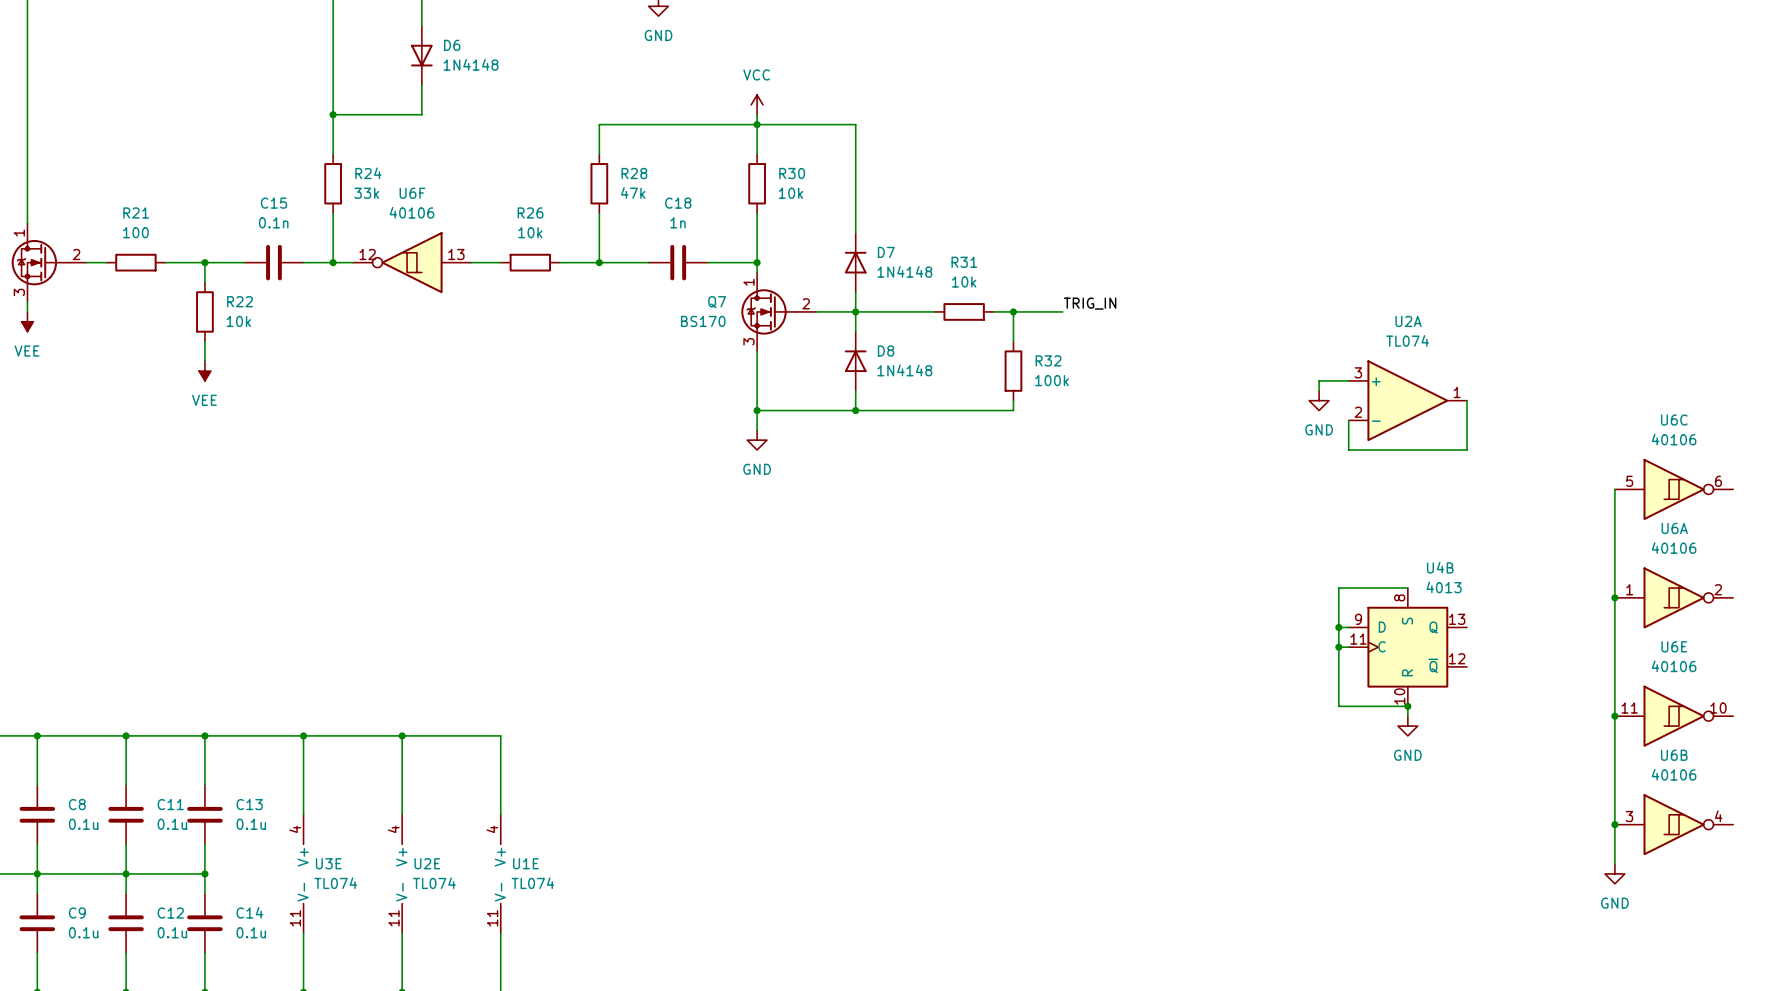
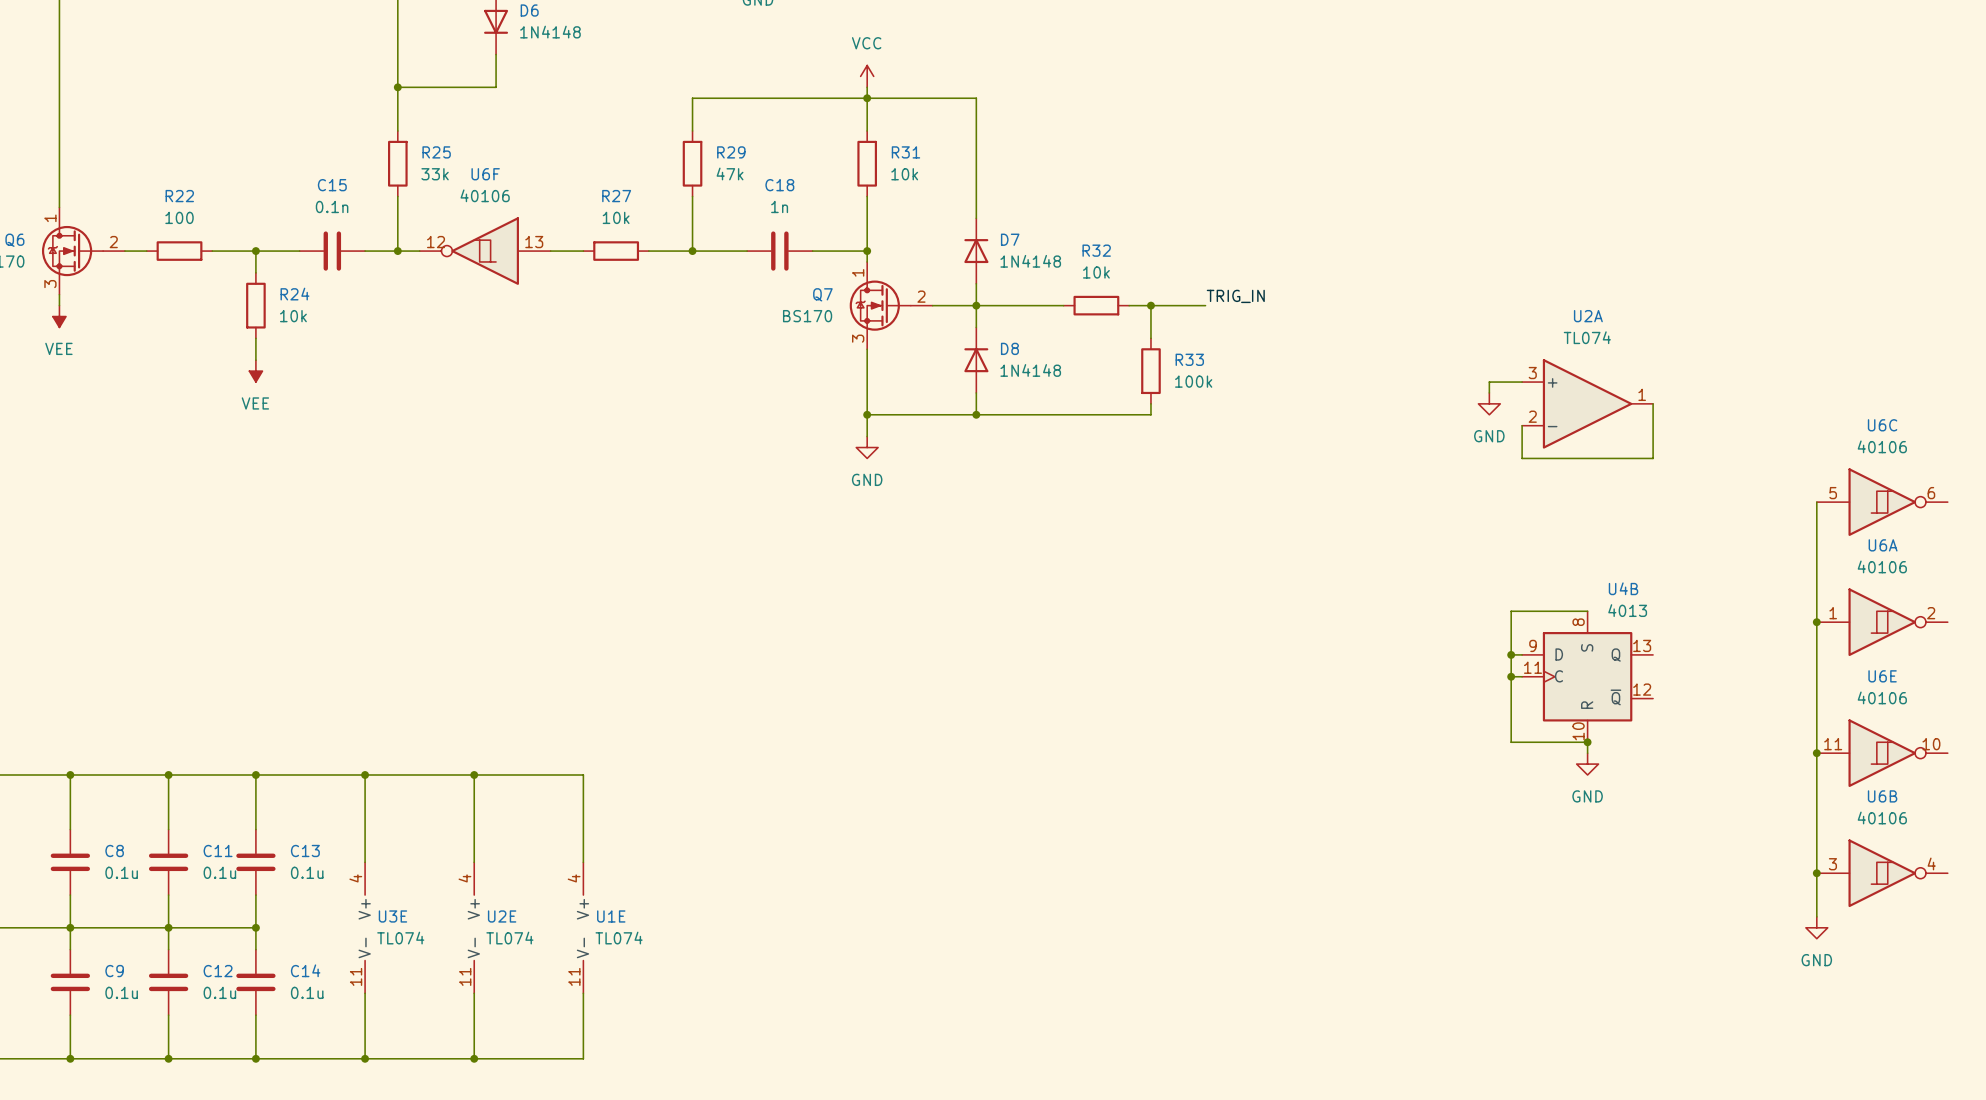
R24 name: R24 (368, 173) -> R25 (436, 152)
R28 name: R28 (634, 173) -> R29 (731, 152)
R30 name: R30 (792, 173) -> R31 (905, 152)
R21 name: R21 (136, 212) -> R22 (179, 196)
R26 name: R26 (530, 212) -> R27 (616, 196)
R31 name: R31 (964, 262) -> R32 (1096, 250)
R22 name: R22 (240, 301) -> R24 (294, 294)
R32 name: R32 (1048, 360) -> R33 (1189, 359)

